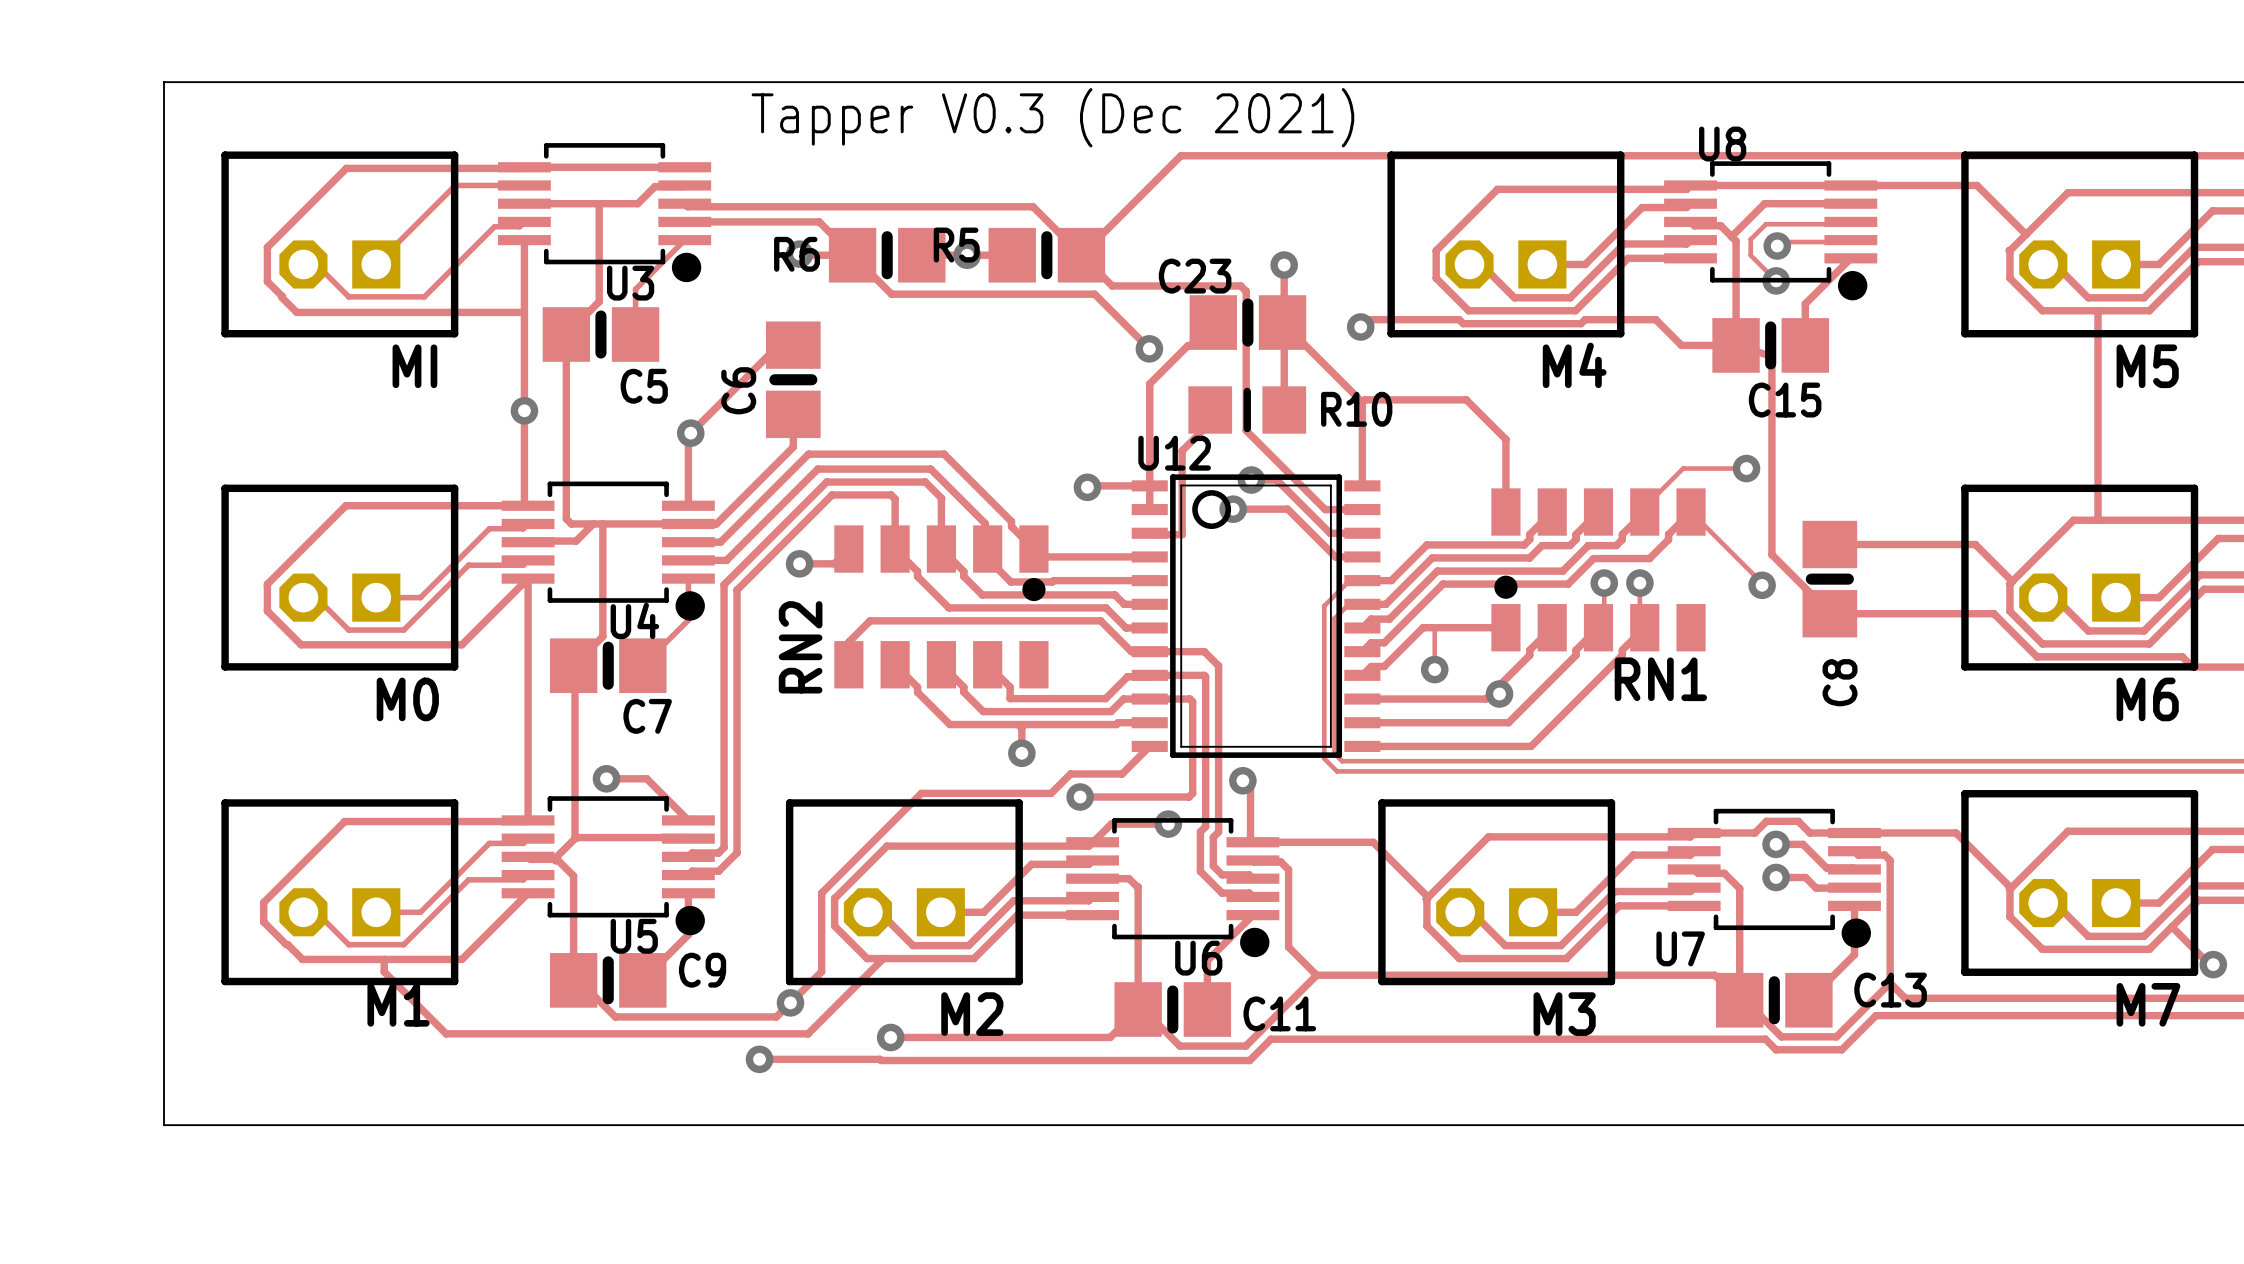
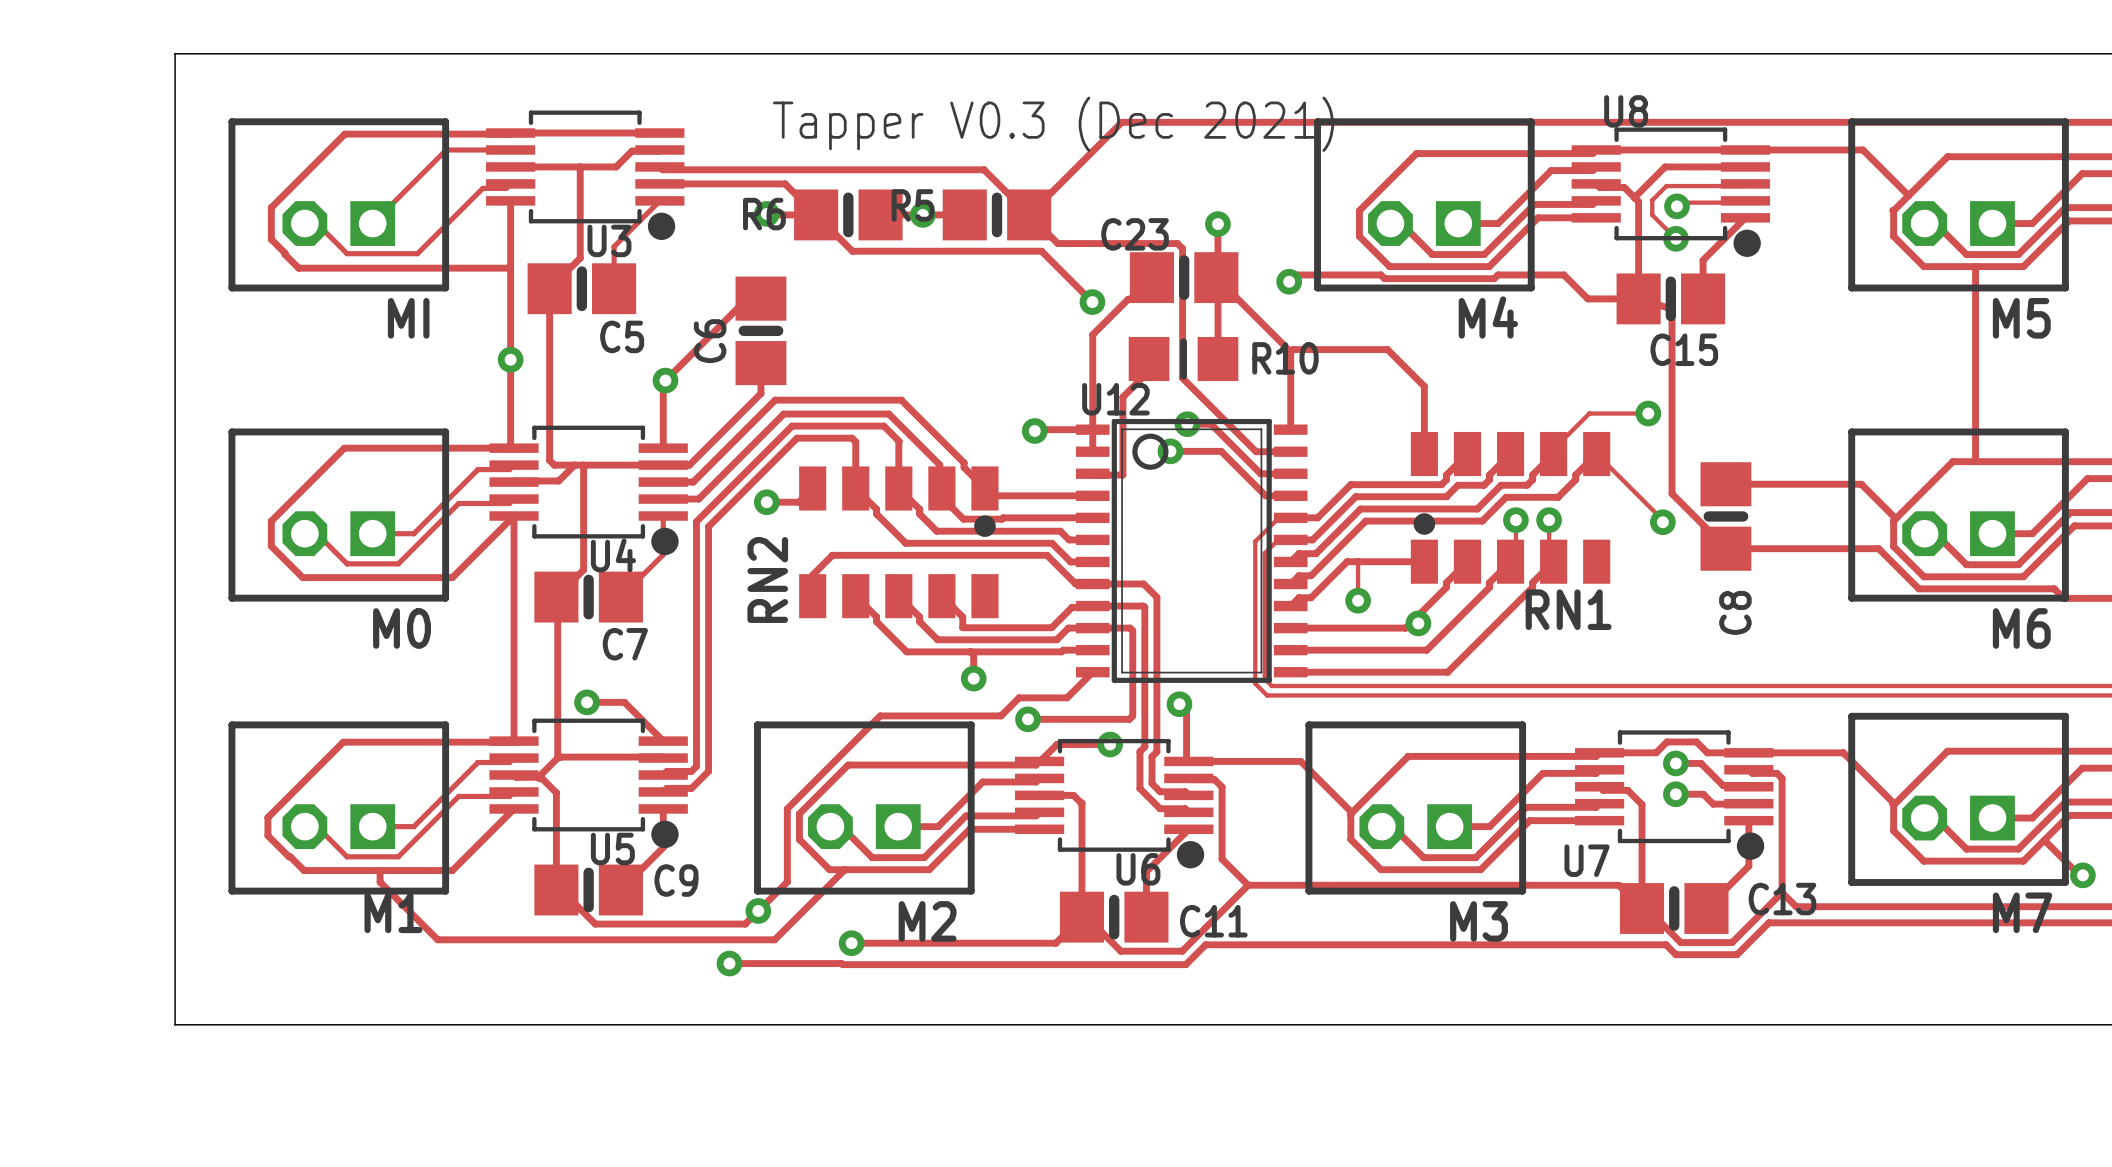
text position: Tapper V0.3 (Dec 2021) (1052, 117) -> Tapper V0.3 (Dec 2021) (1053, 124)

